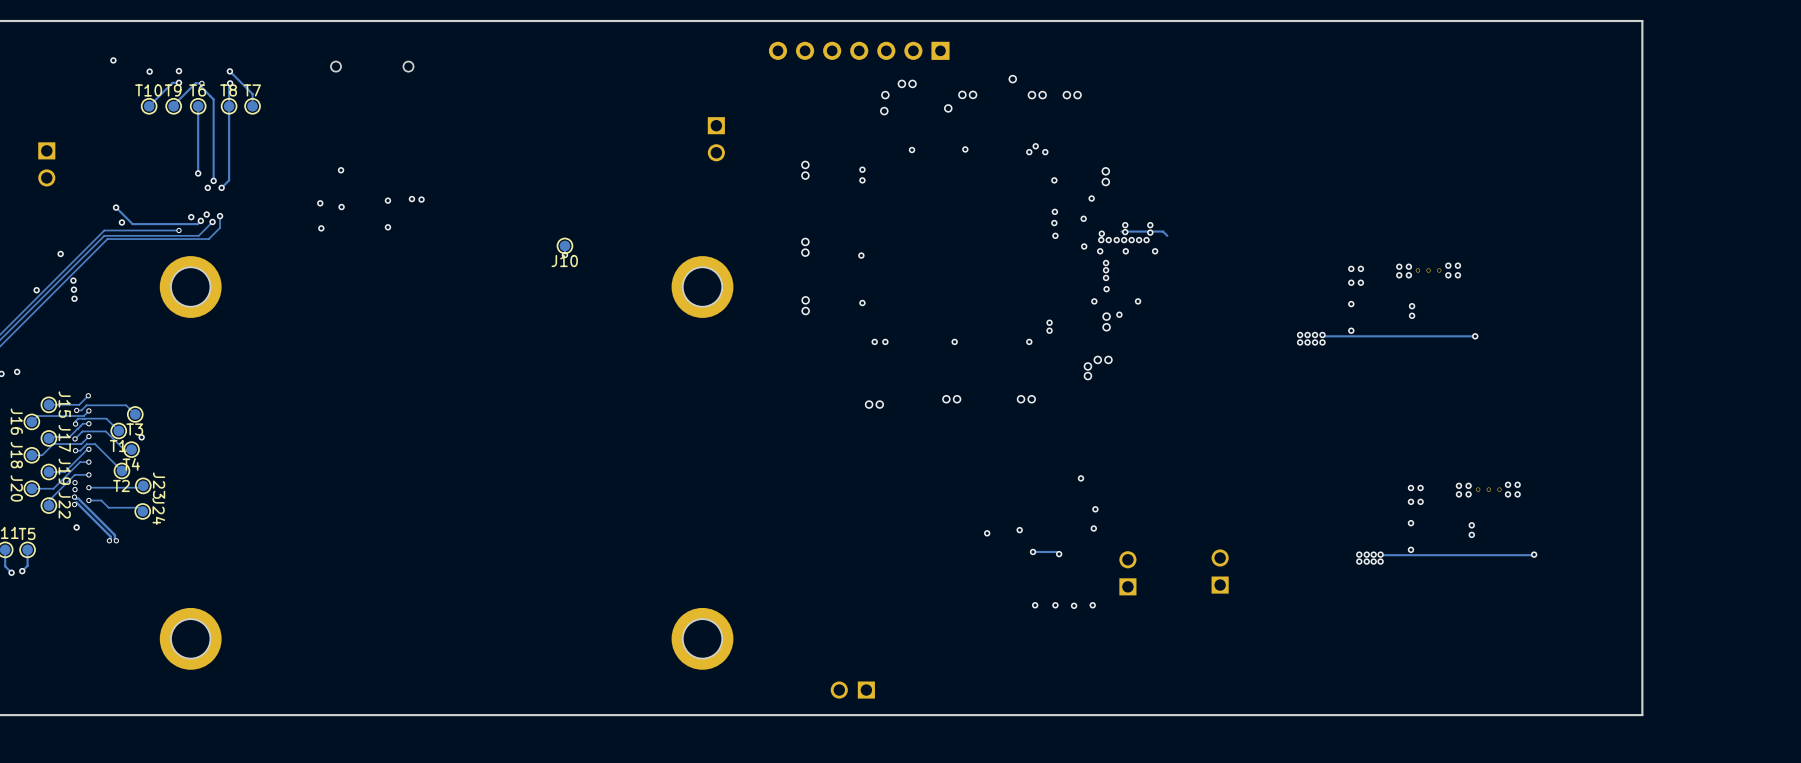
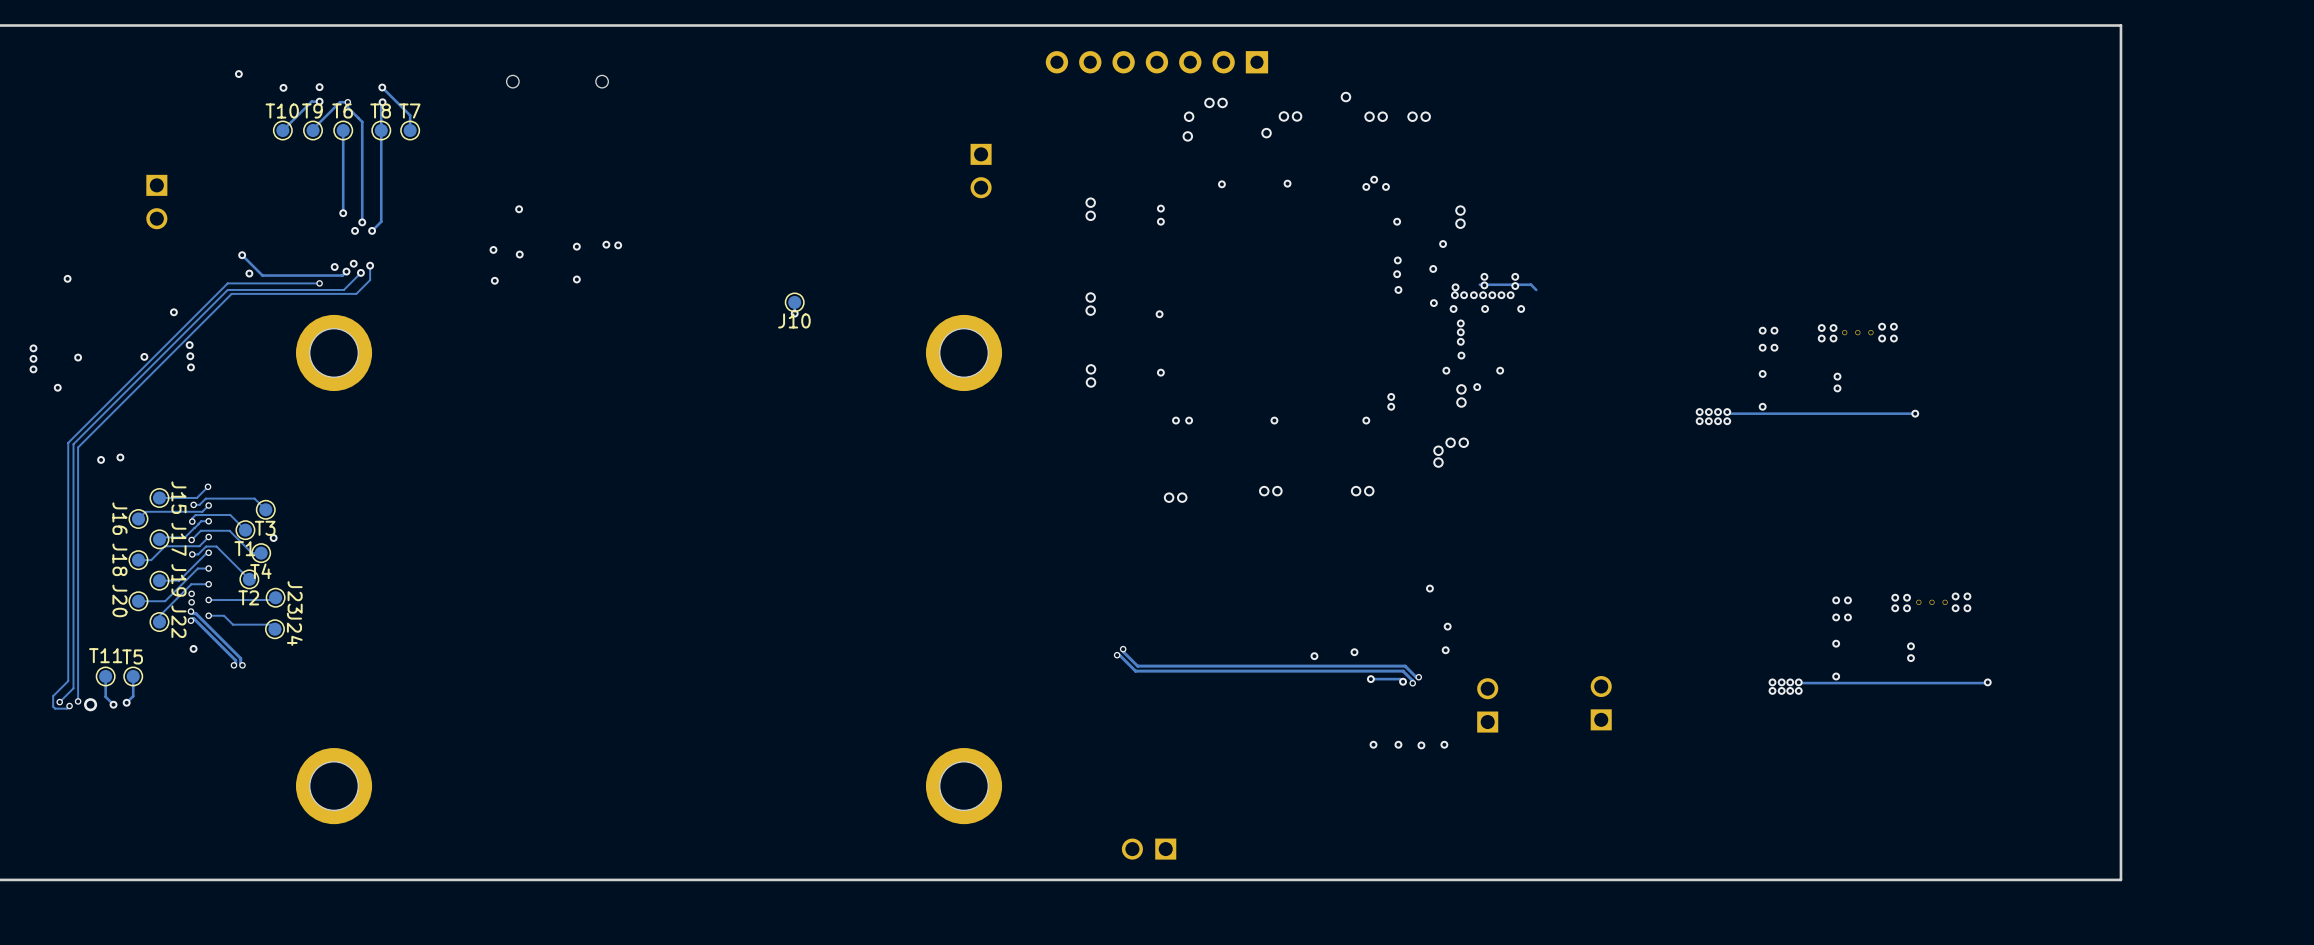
track: none -> (1123, 649) (1123, 651) (1137, 666) (1405, 666) (1416, 677) (1418, 677)
via: none -> (1123, 649)
track: none -> (1117, 655) (1119, 655) (1135, 671) (1403, 671) (1412, 680) (1412, 683)
via: none -> (1117, 655)
via: none -> (1418, 677)
via: none -> (1412, 683)

